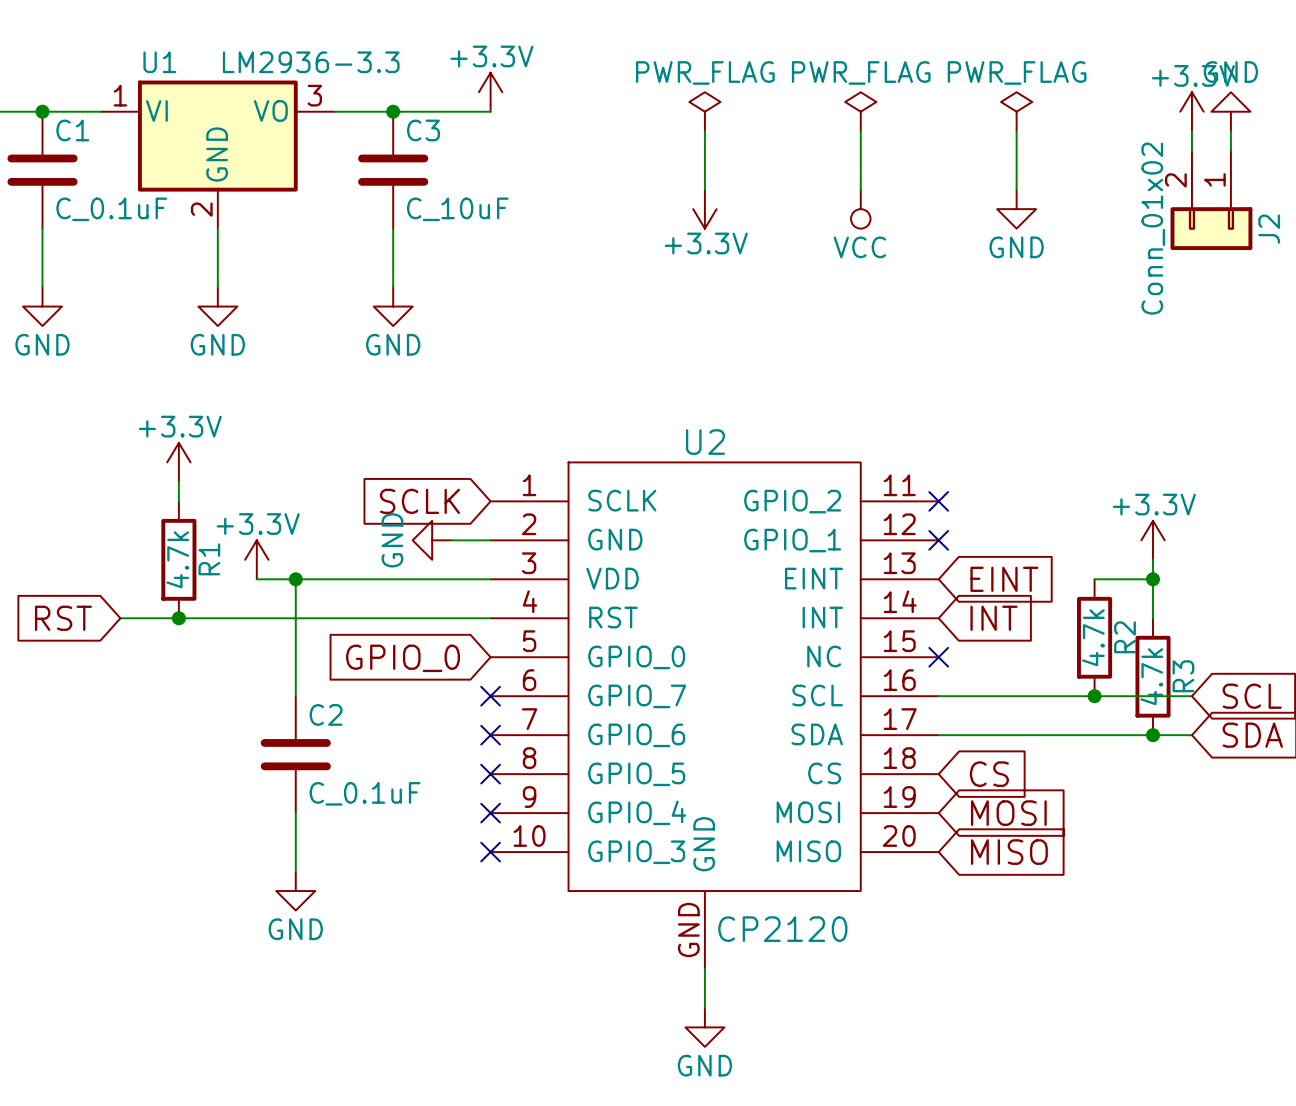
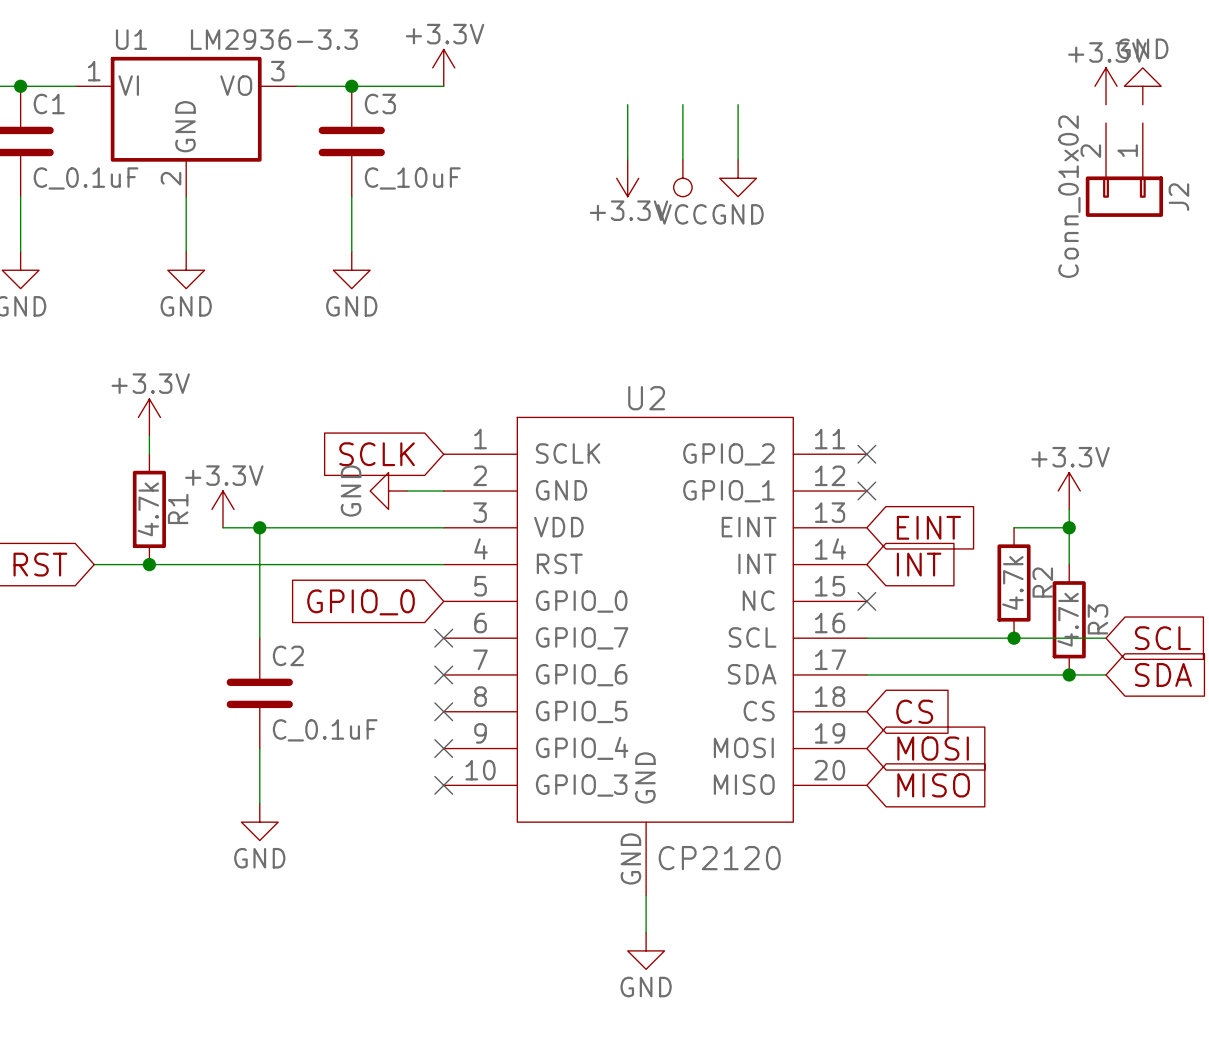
power symbol: PWR_FLAG (704, 111) -> none
power symbol: PWR_FLAG (860, 111) -> none
power symbol: PWR_FLAG (1016, 111) -> none
wire: (704, 131) (704, 189) -> (627, 104) (627, 159)
wire: (860, 131) (860, 189) -> (738, 104) (738, 159)
wire: (1016, 131) (1016, 189) -> (682, 104) (682, 159)
wire: (1191, 131) (1191, 150) -> none
wire: (1230, 131) (1230, 150) -> none
power symbol position: +3.3V (704, 209) -> +3.3V (627, 178)
power symbol position: VCC (860, 209) -> VCC (682, 178)
power symbol position: GND (1016, 209) -> GND (738, 178)

